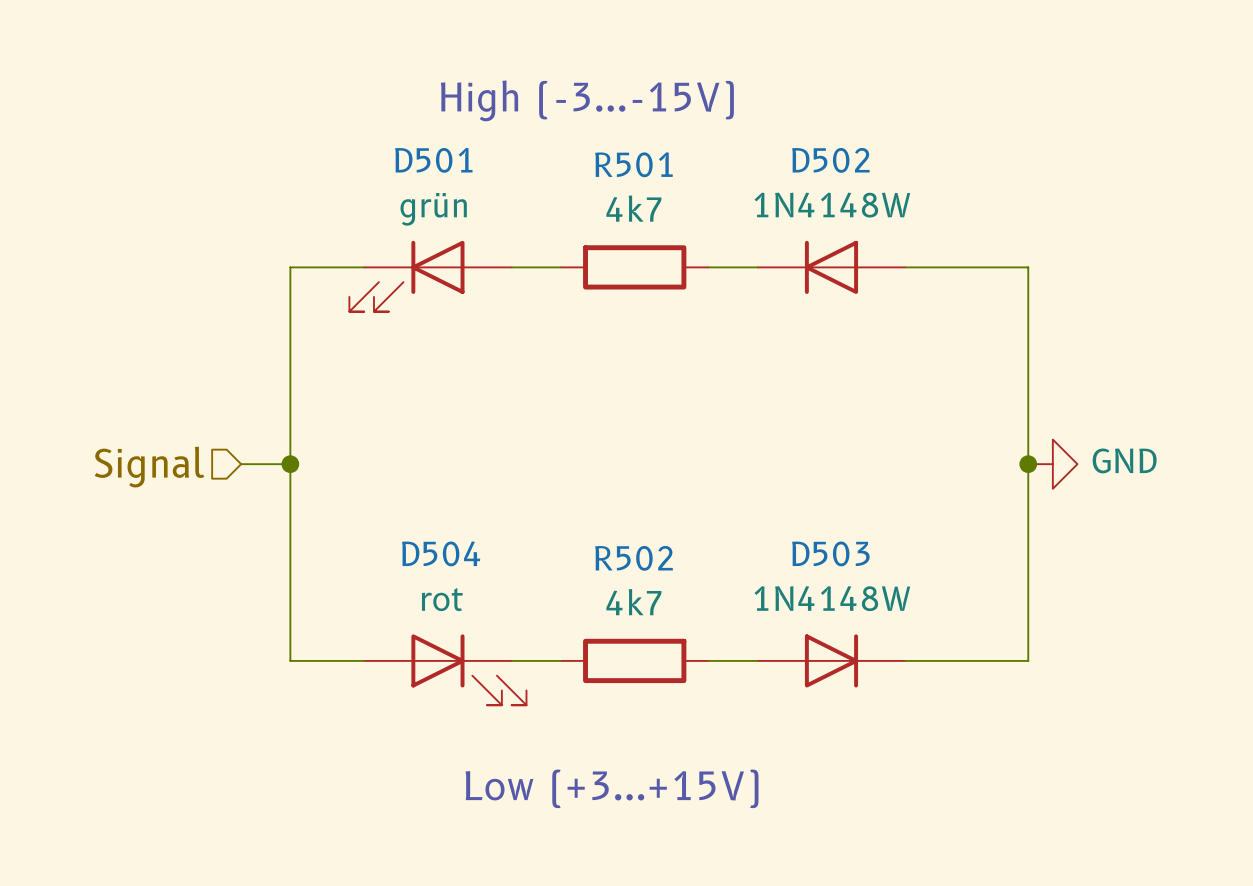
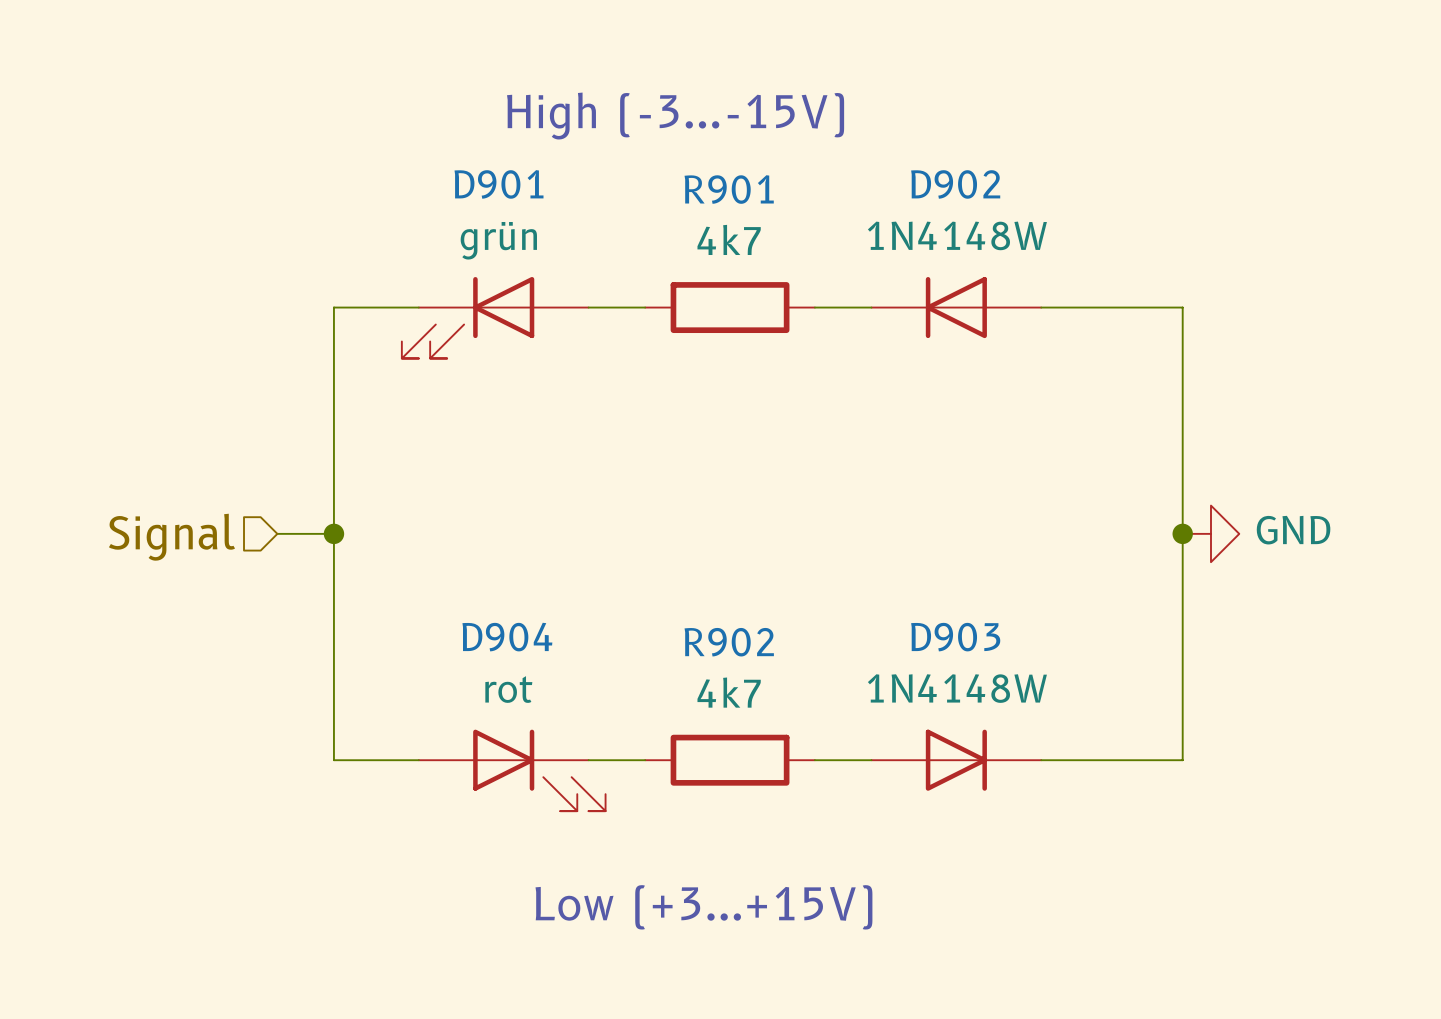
D501 name: D501 (433, 160) -> D901 (499, 184)
D502 name: D502 (830, 160) -> D902 (955, 184)
R501 name: R501 (633, 164) -> R901 (729, 189)
D504 name: D504 (441, 553) -> D904 (507, 637)
D503 name: D503 (830, 553) -> D903 (955, 637)
R502 name: R502 (633, 558) -> R902 (729, 642)

